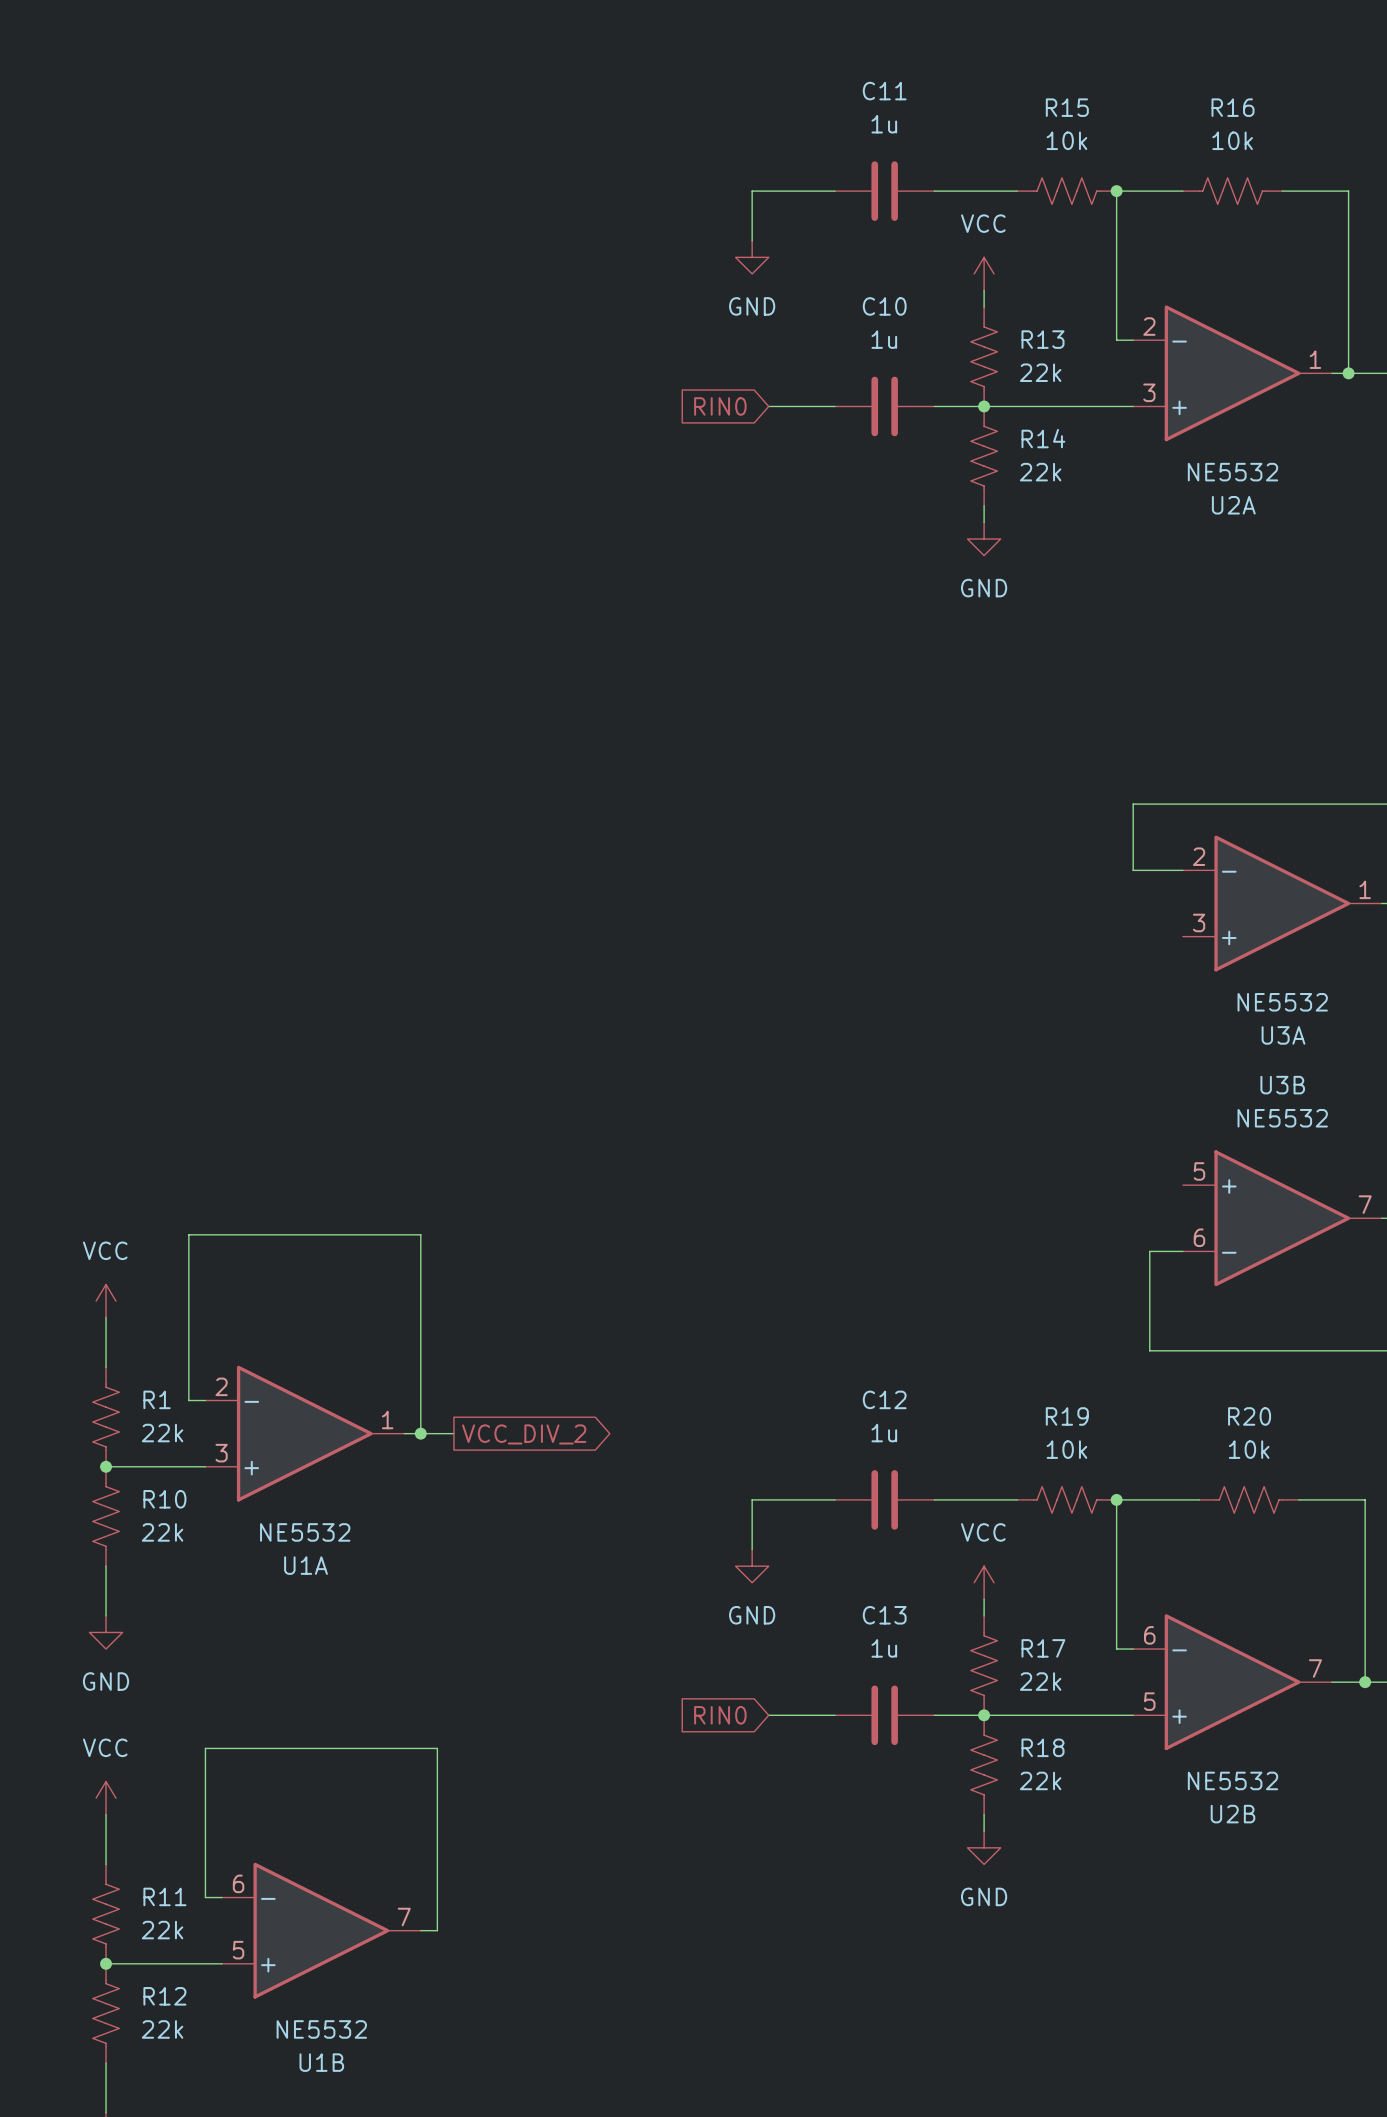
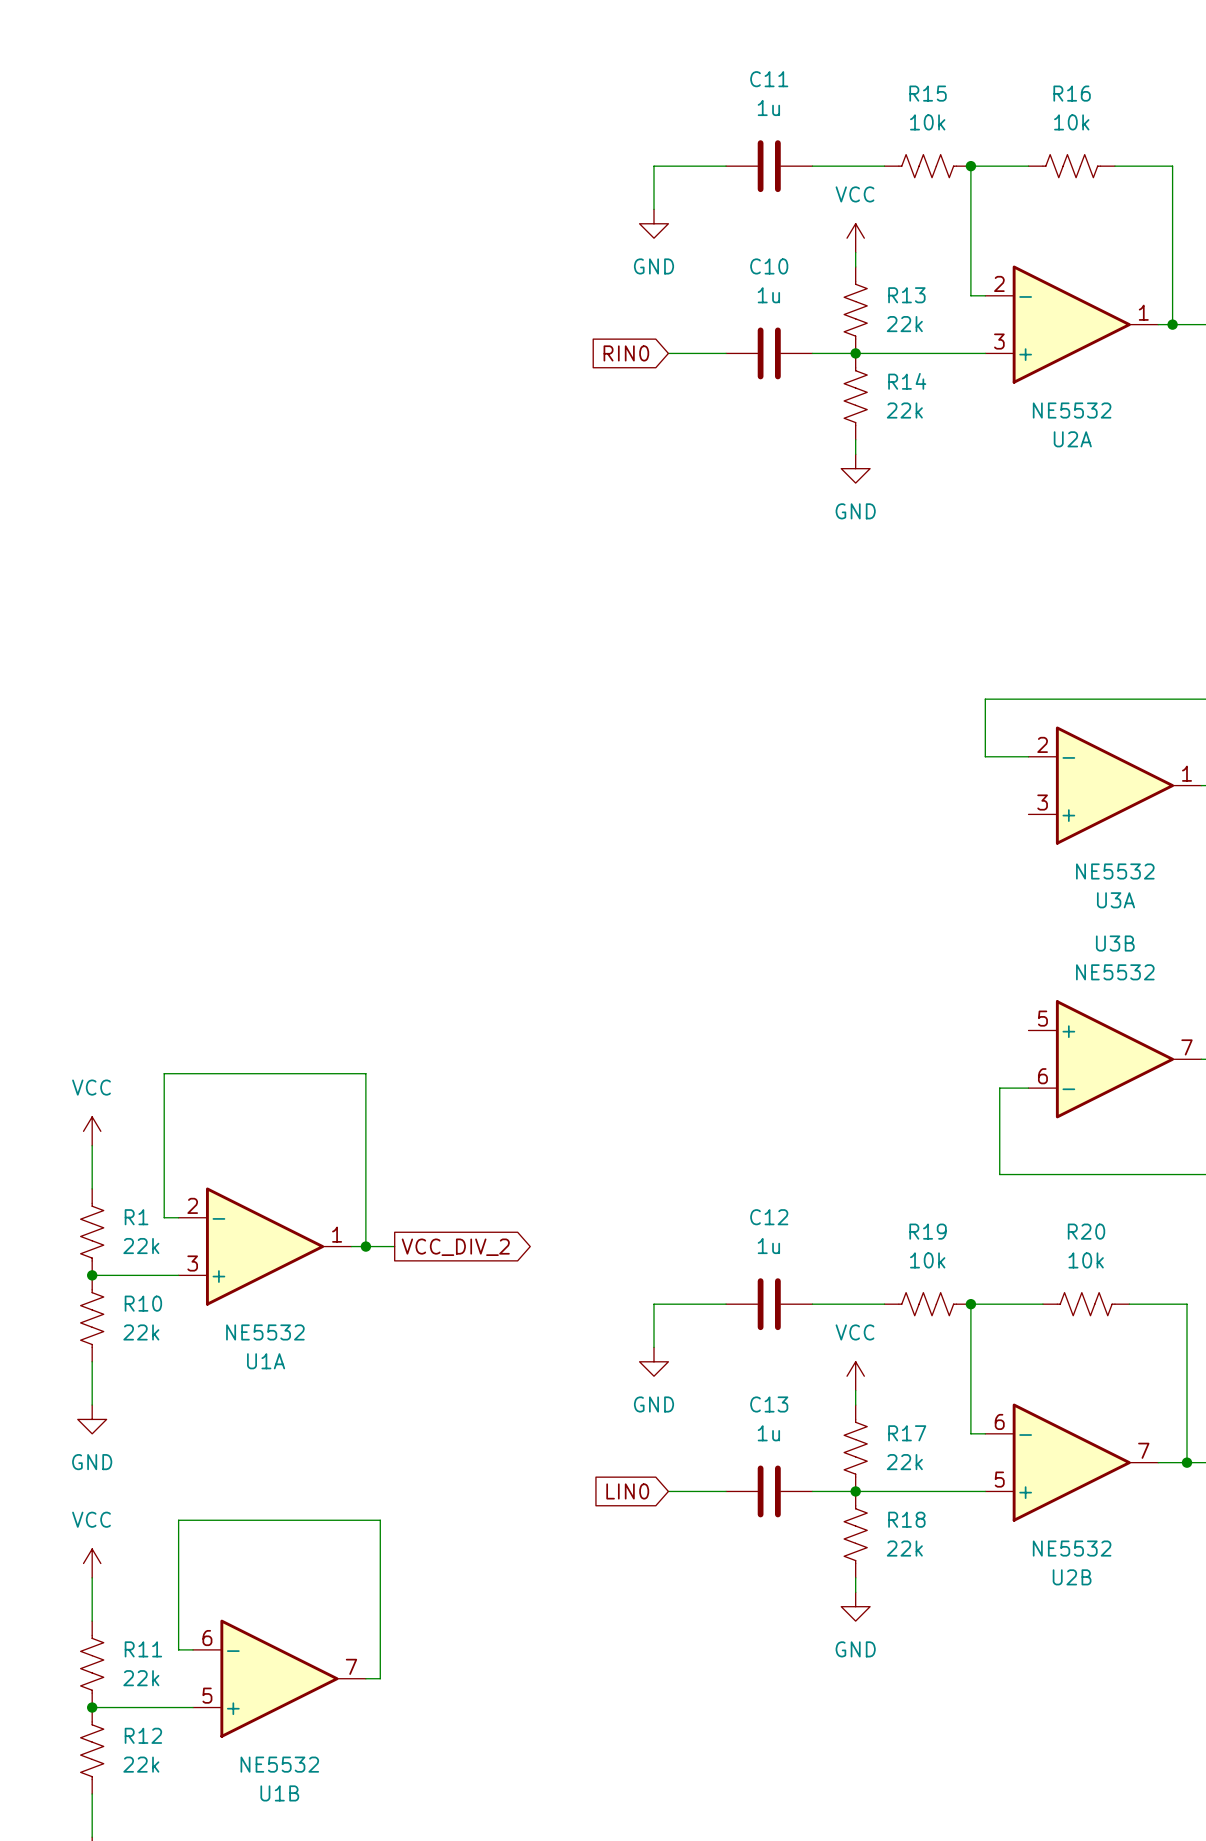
global label: RIN0 (720, 1715) -> LIN0 (627, 1491)

